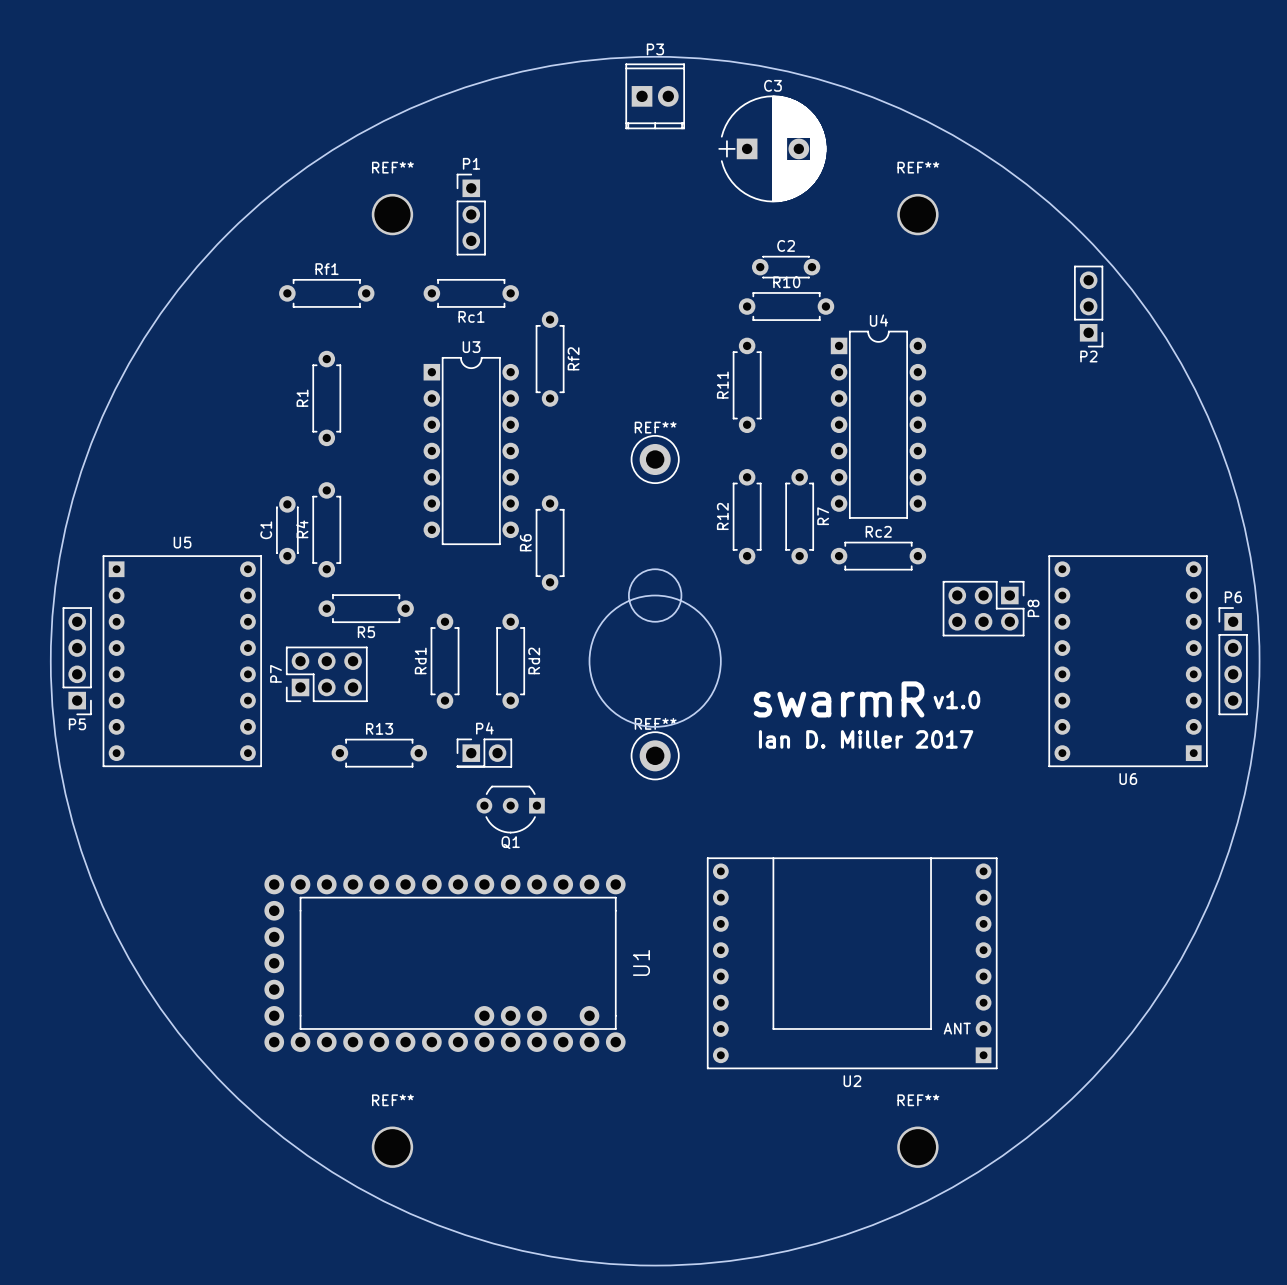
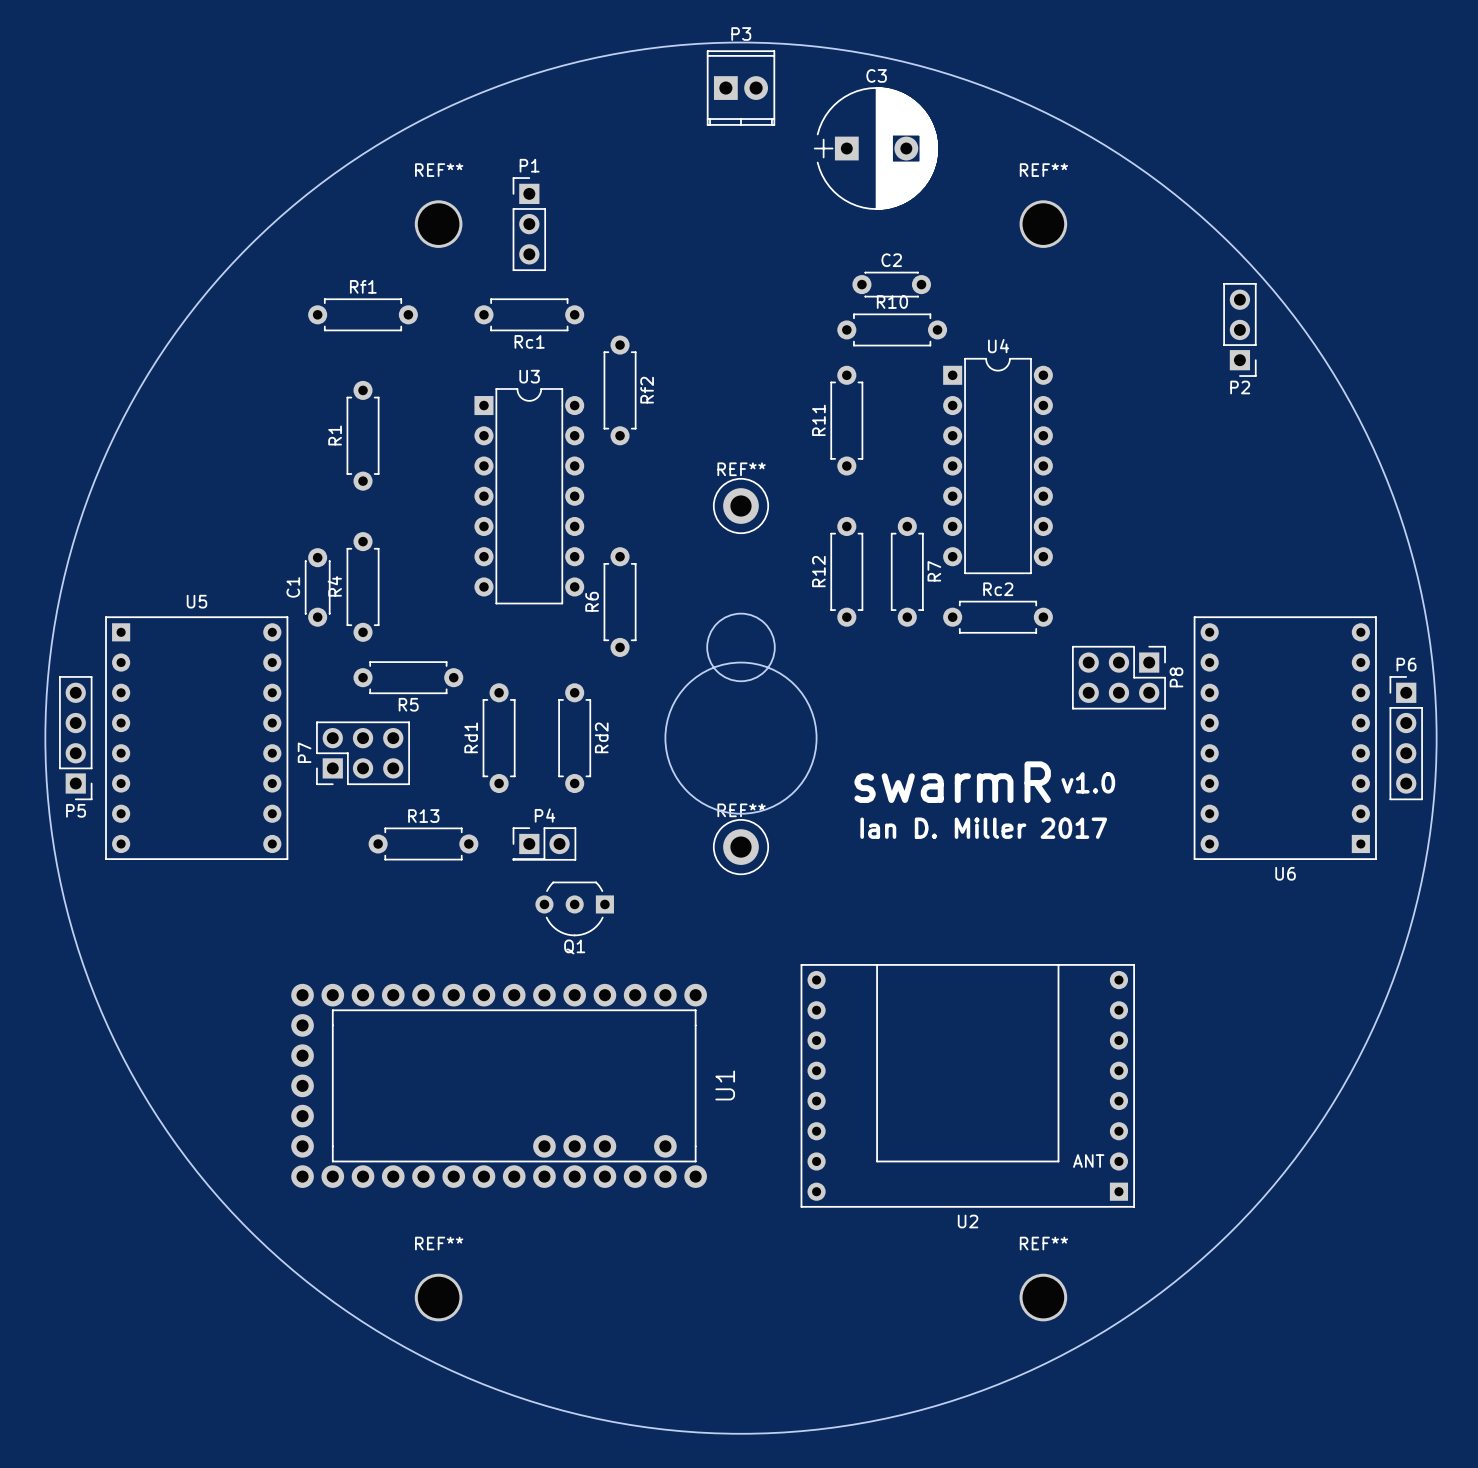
round board edge: none -> [706, 612, 776, 683]
round board edge: [628, 568, 683, 623] -> none

